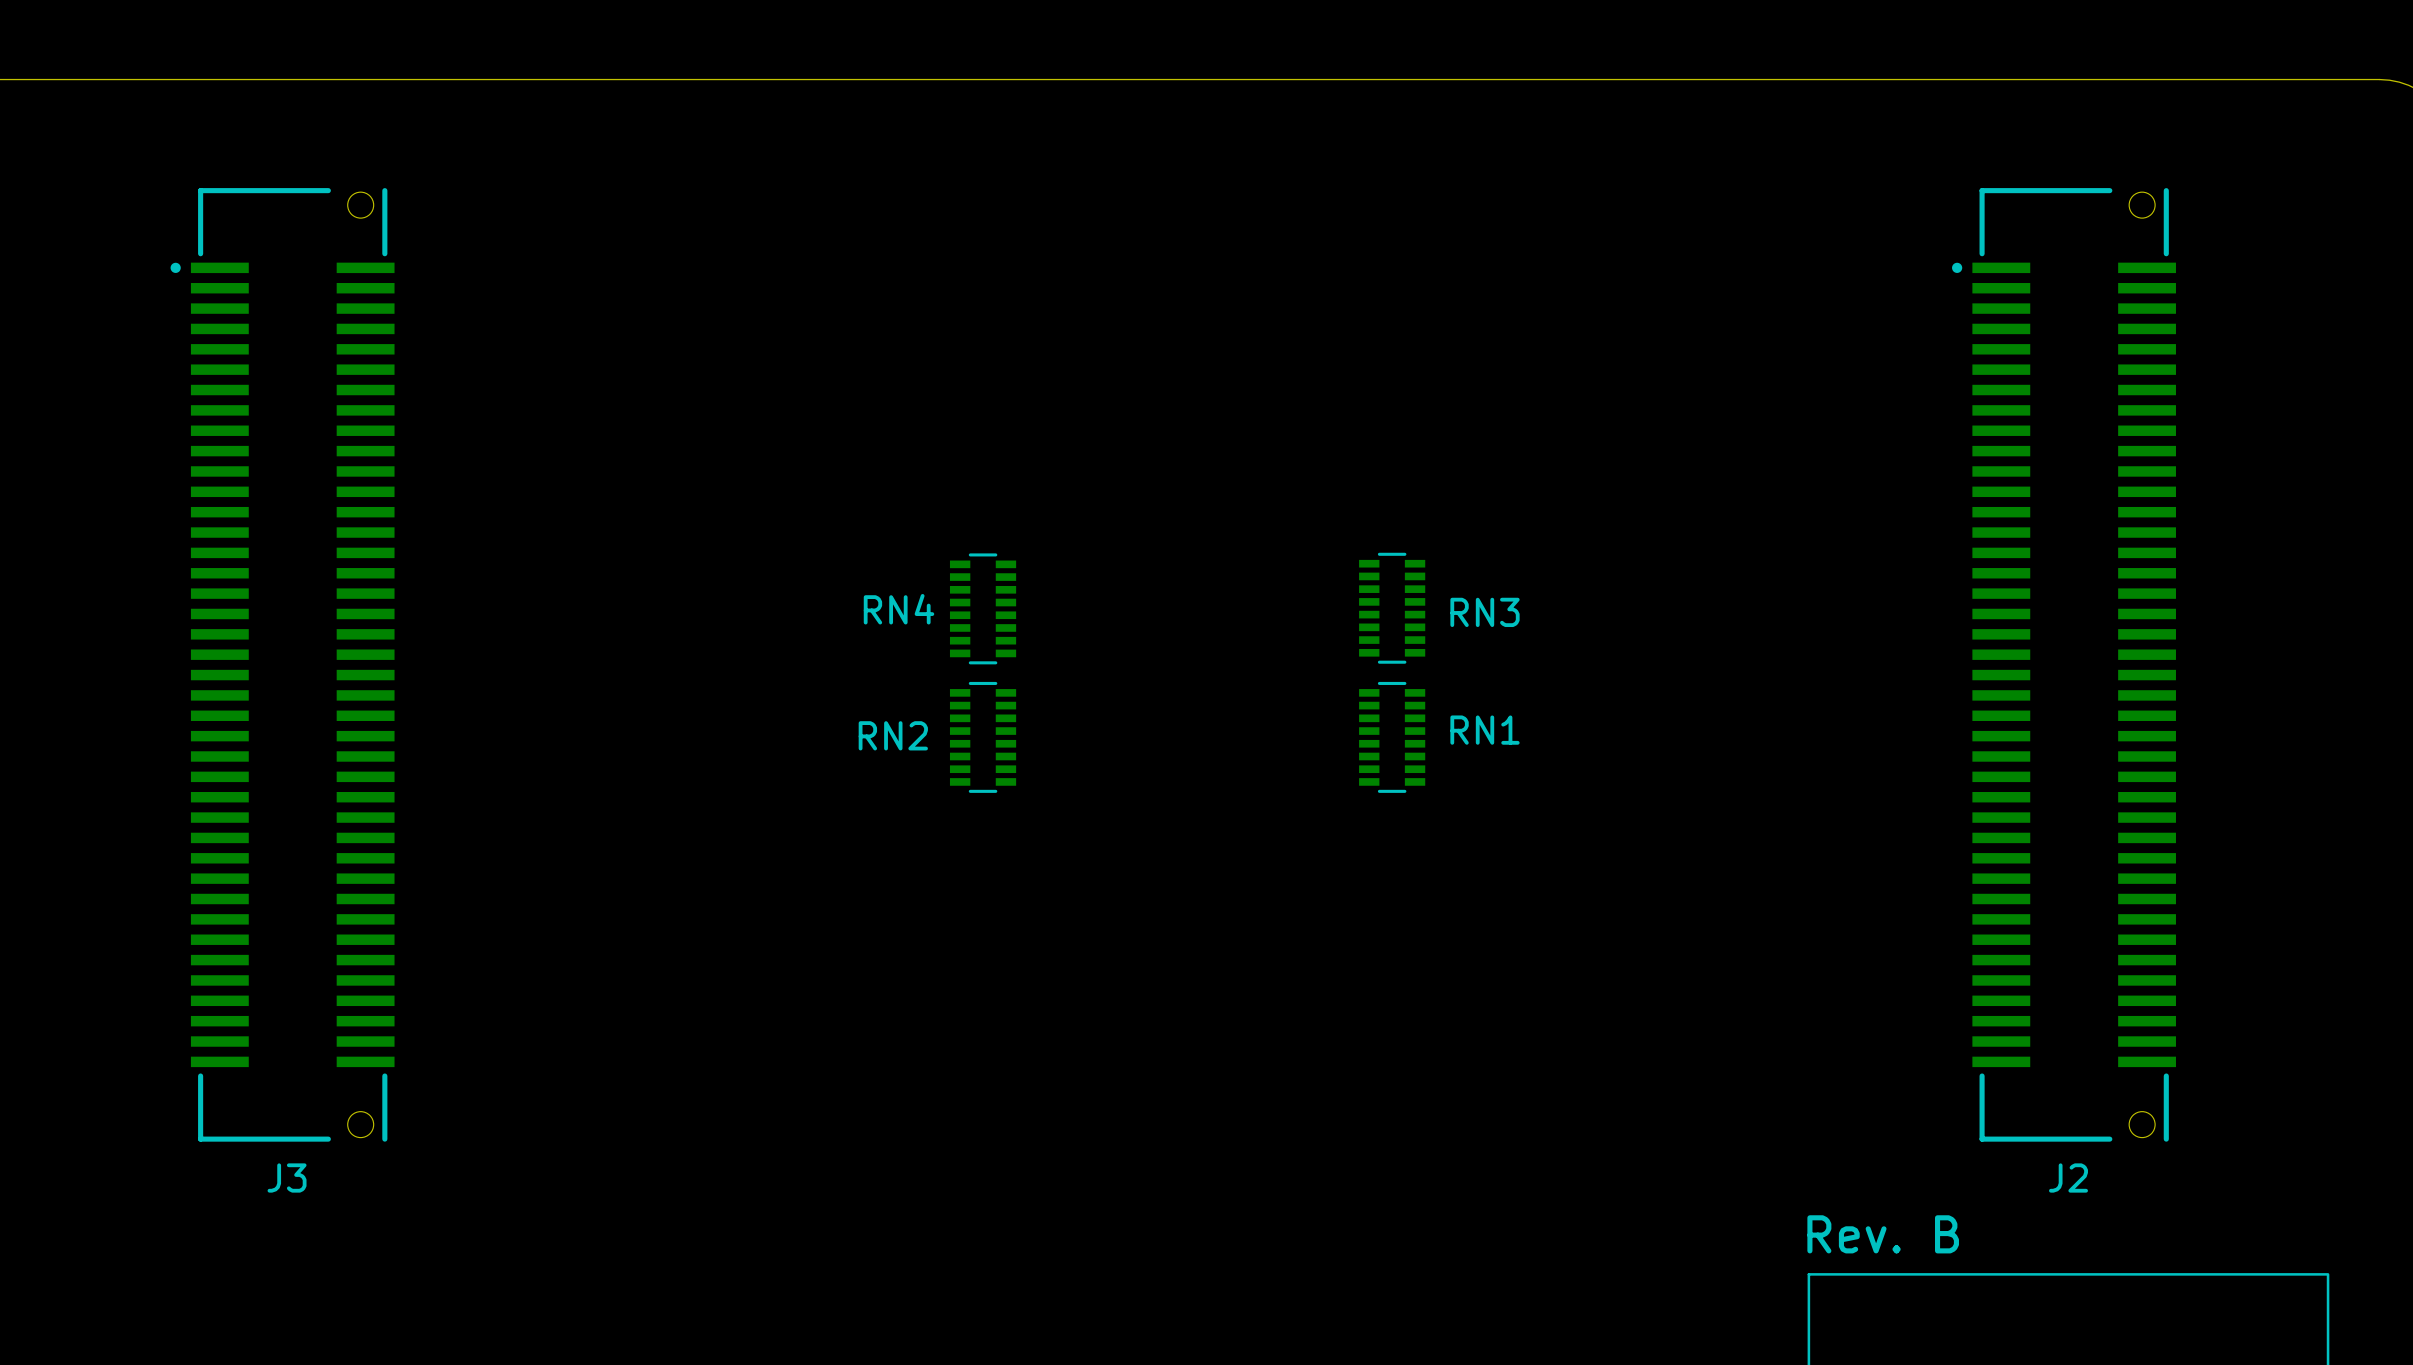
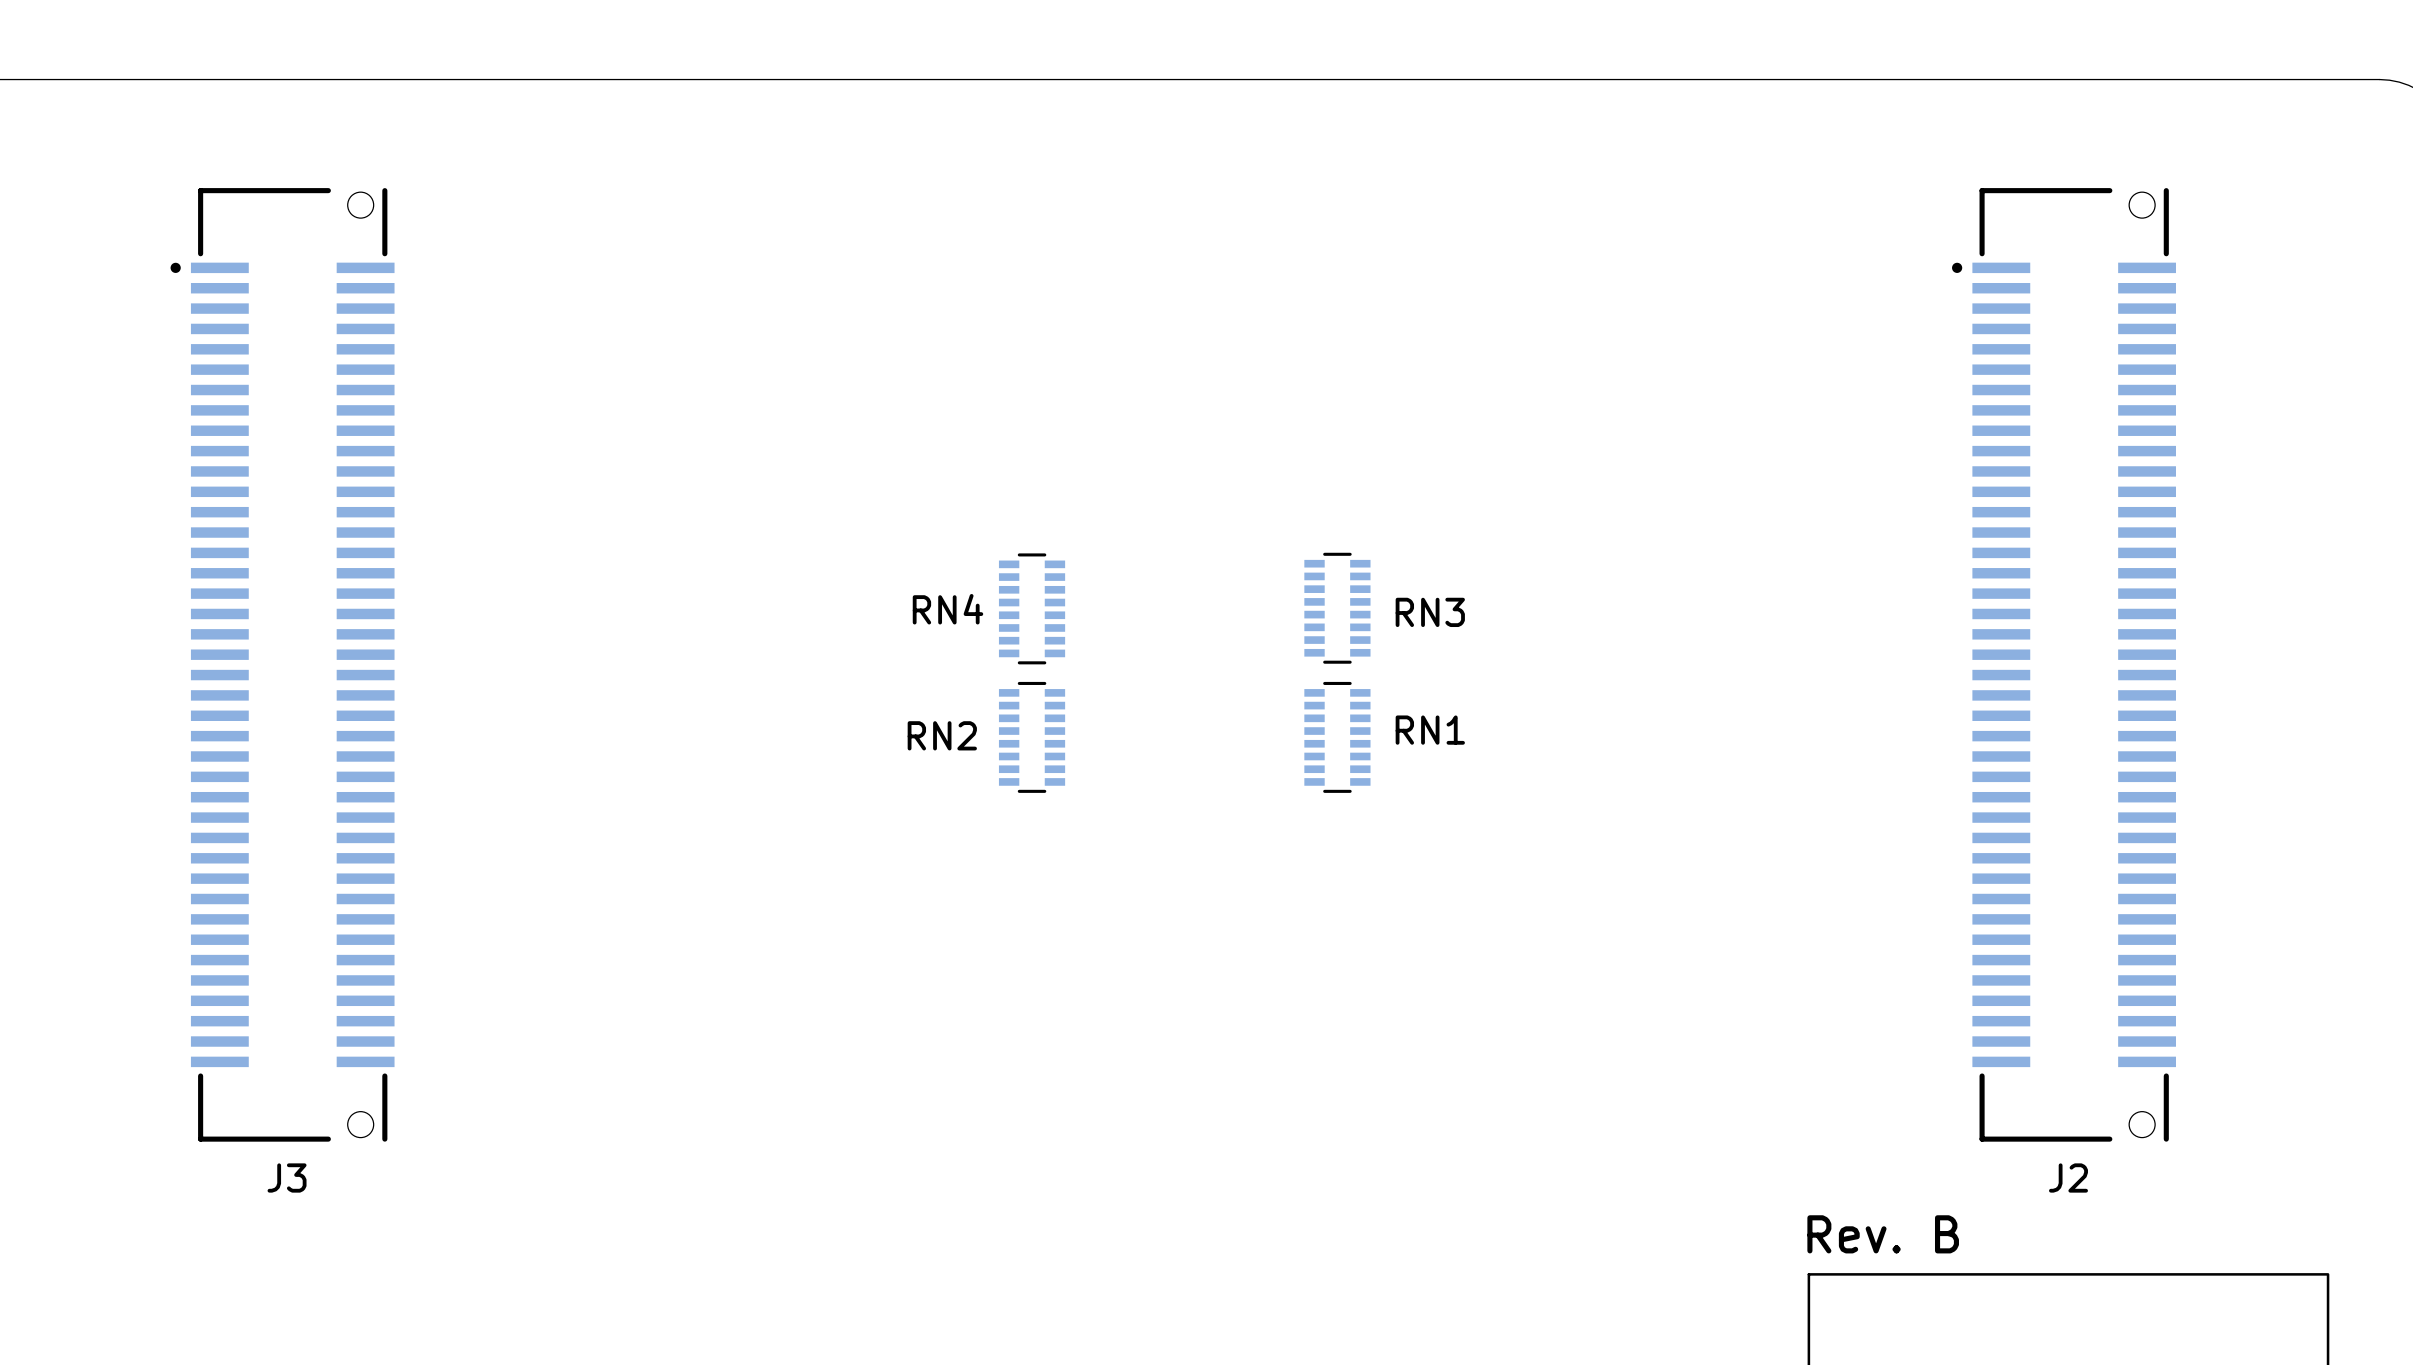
RN4 position: (983, 608) -> (1032, 608)
RN3 position: (1392, 608) -> (1337, 608)
RN2 position: (983, 737) -> (1032, 737)
RN1 position: (1392, 737) -> (1337, 737)

